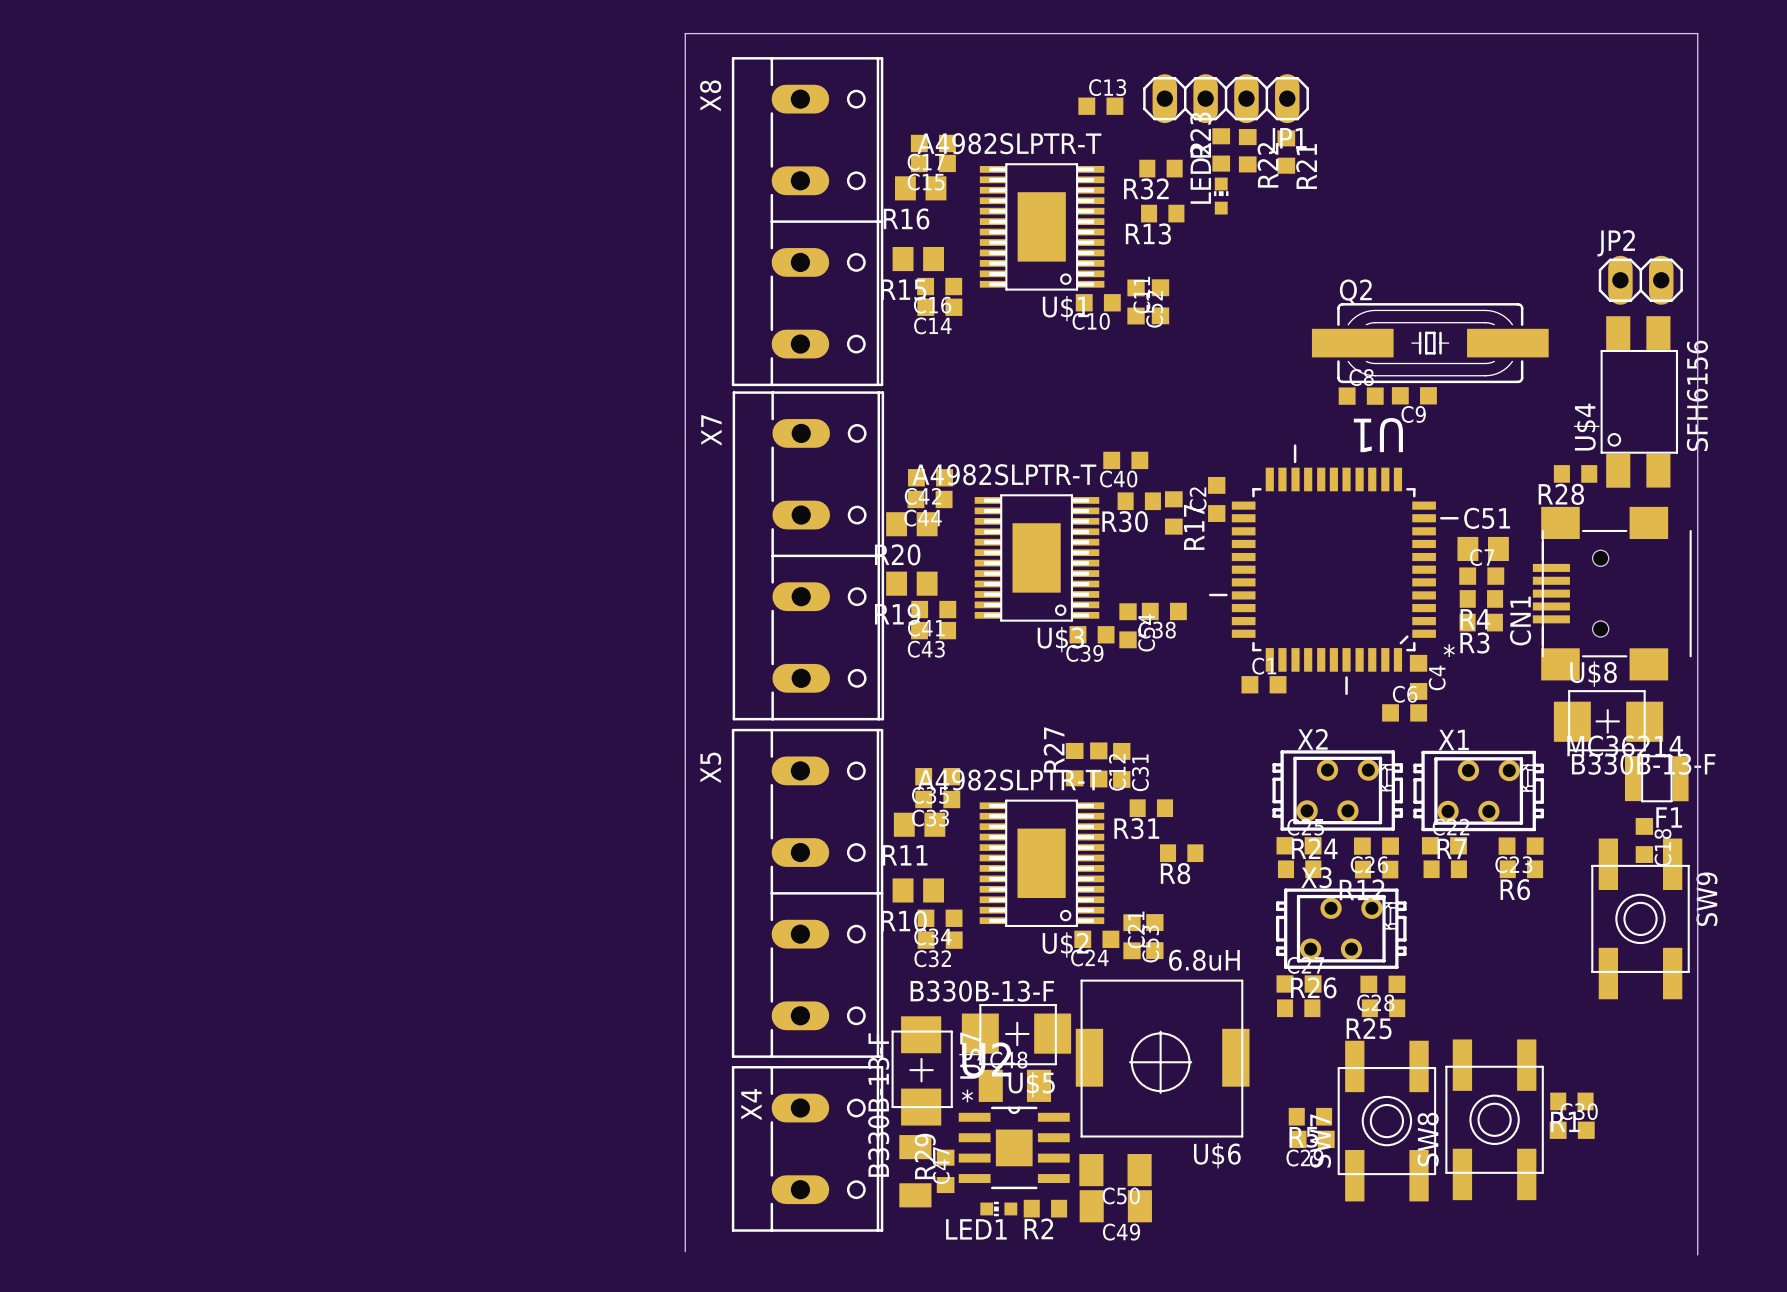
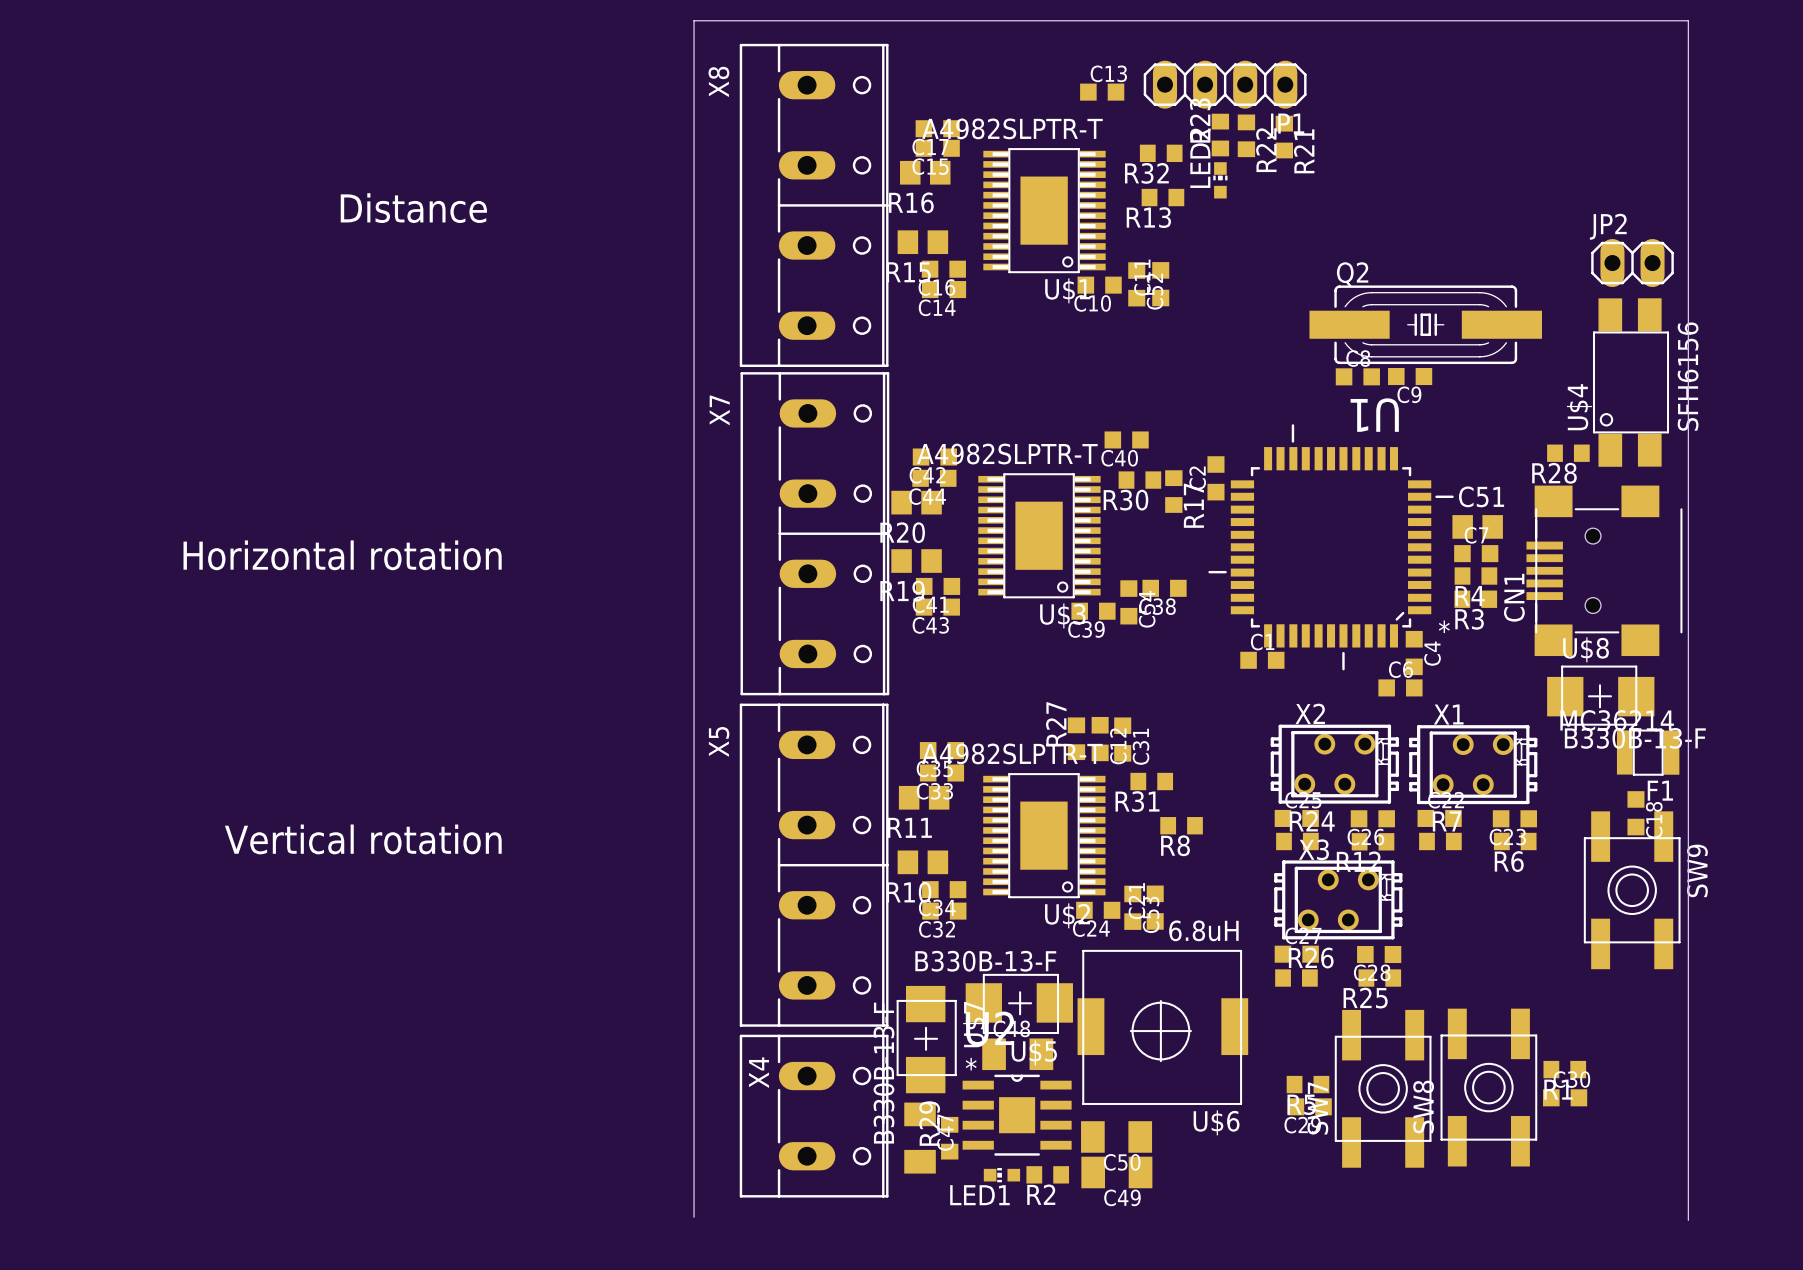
text: none -> Distance (413, 208)
text: none -> Horizontal rotation (342, 555)
text: none -> Vertical rotation (363, 839)

